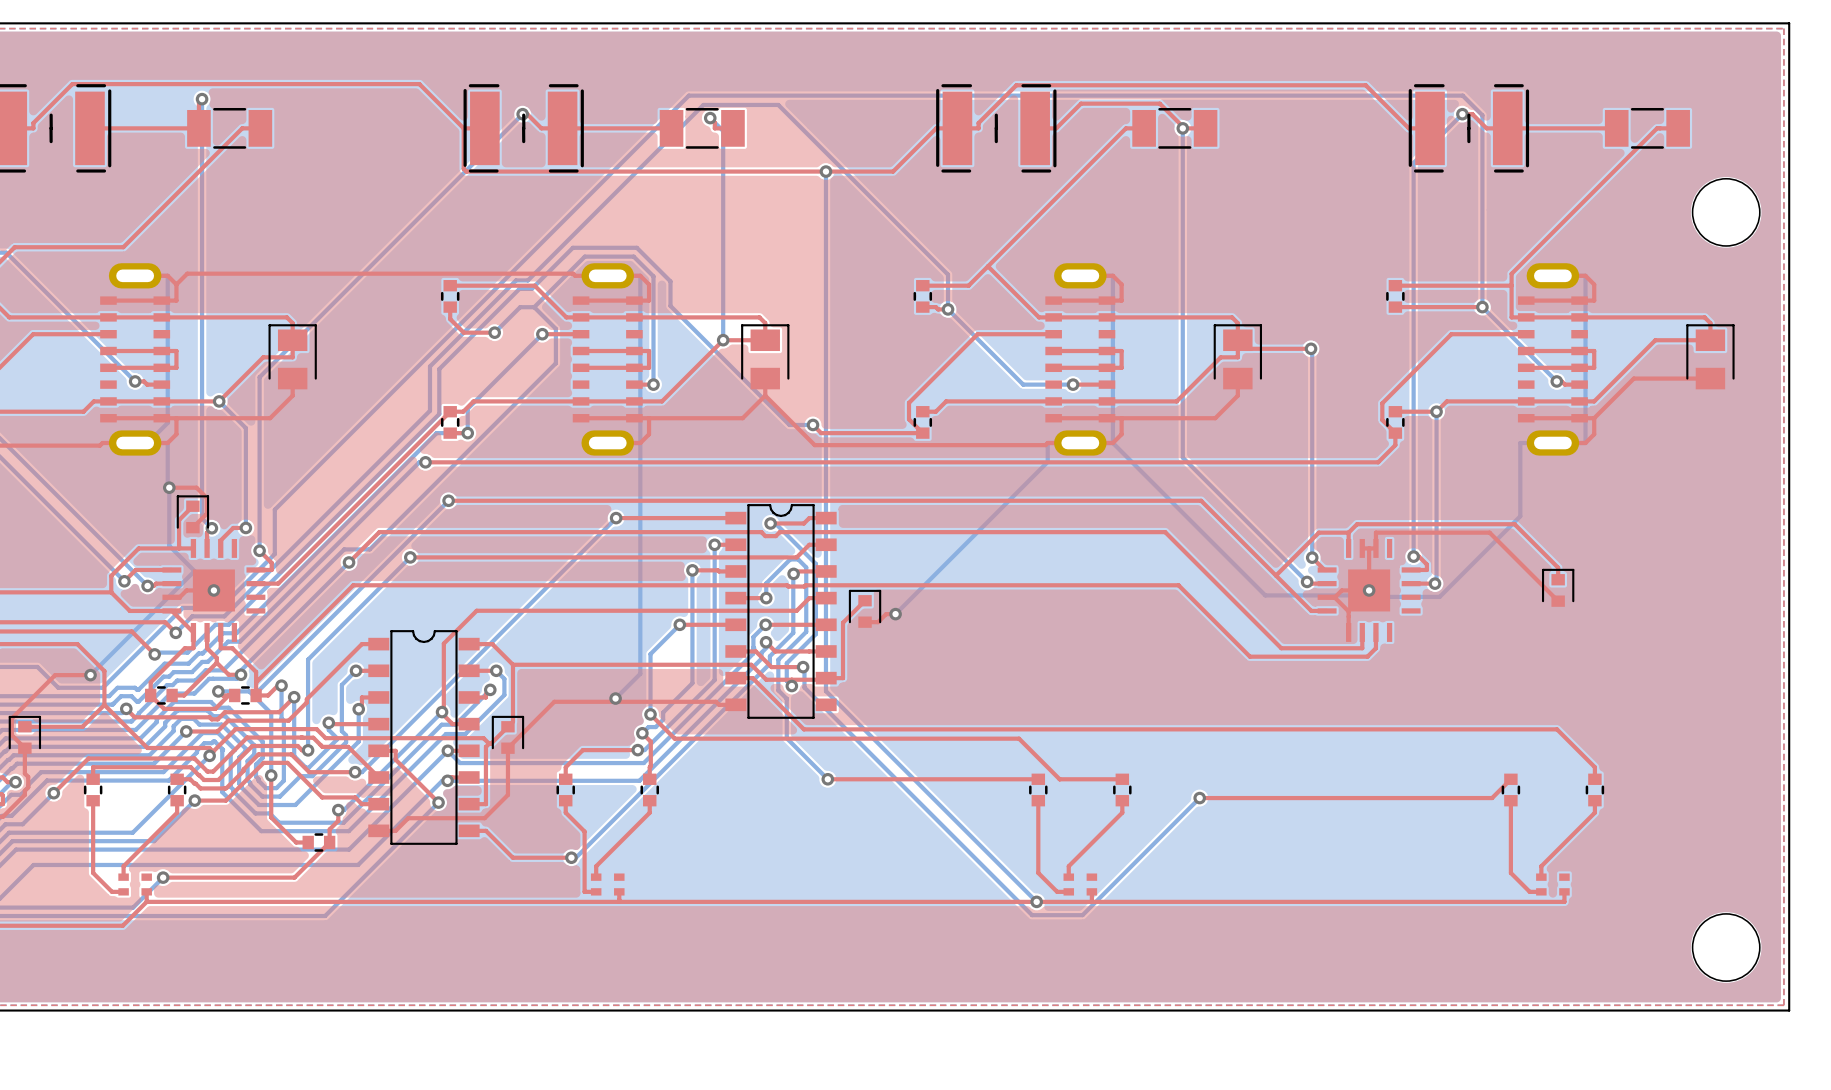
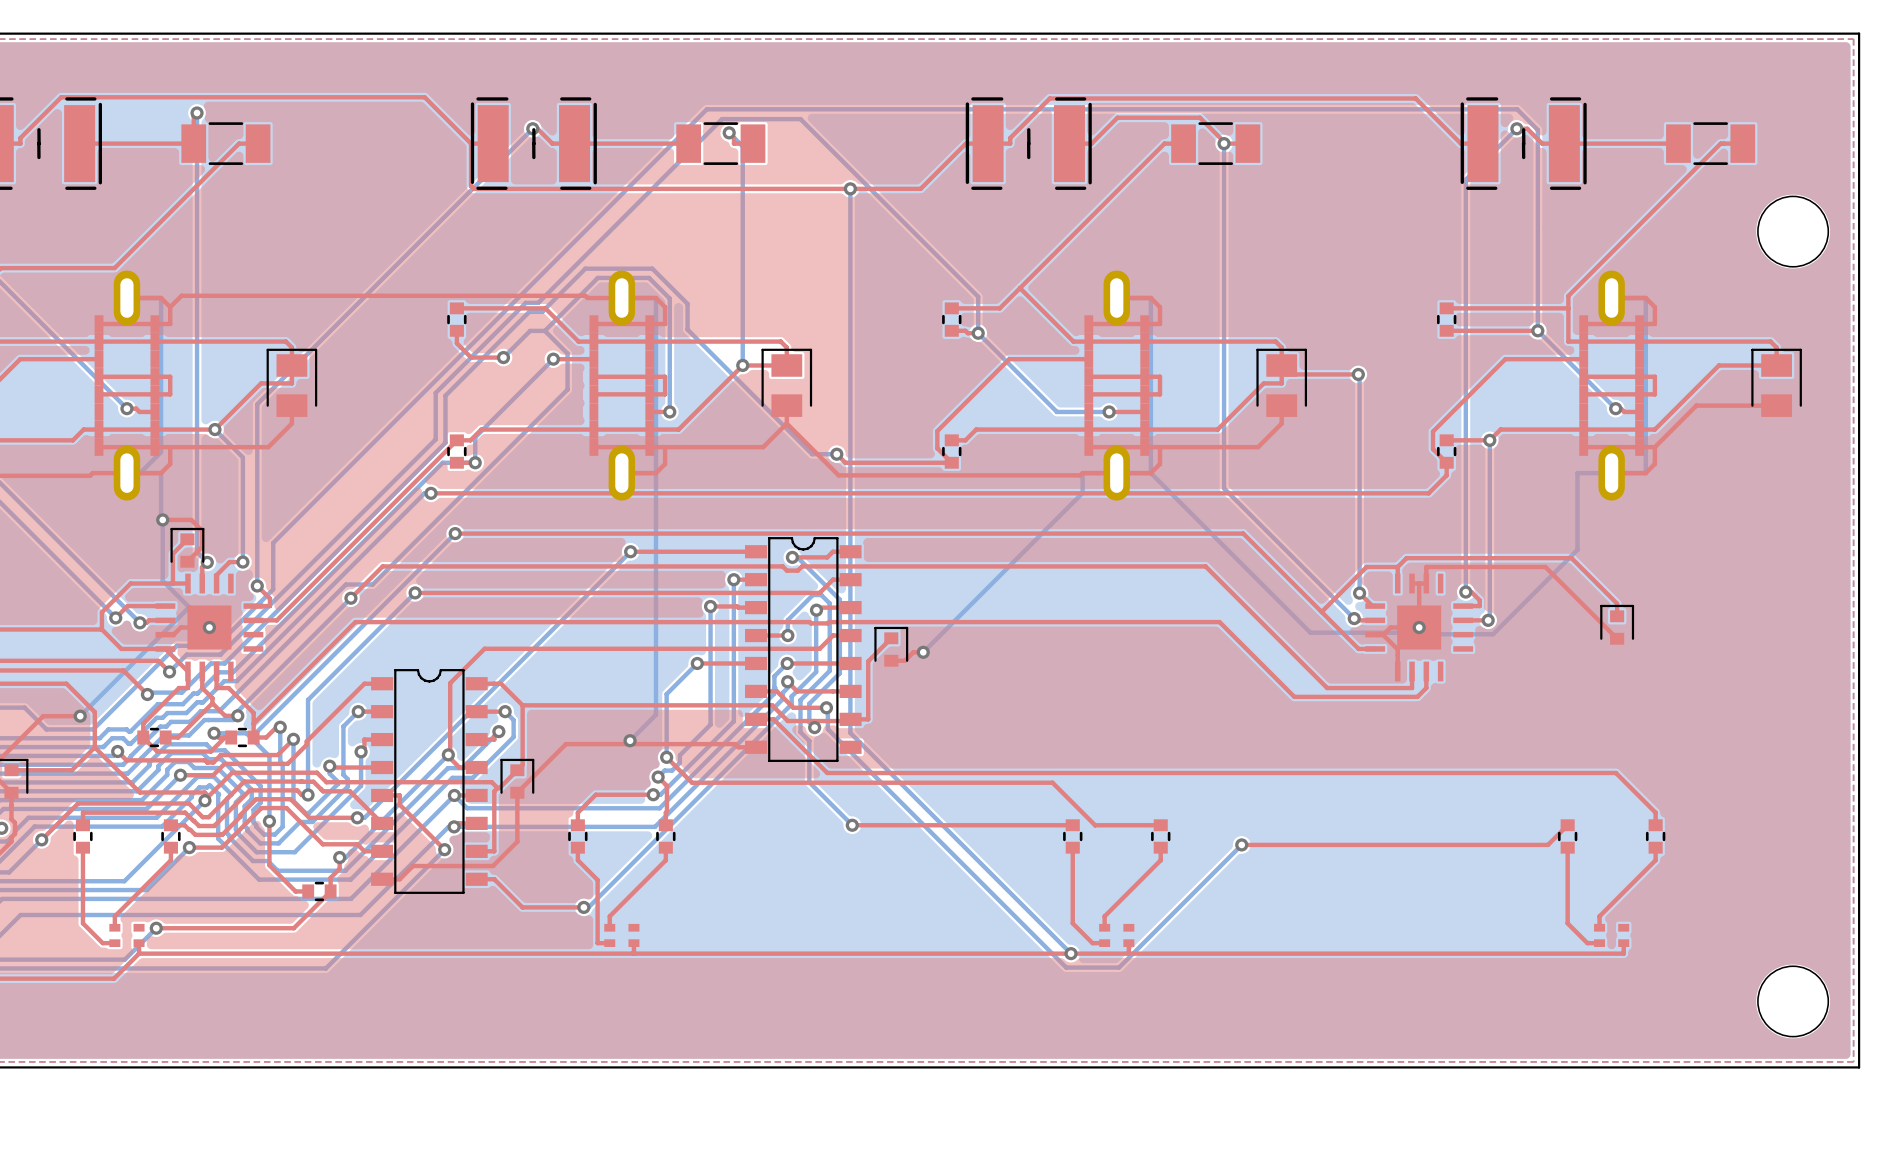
part footprint: [100, 263, 171, 456] -> [94, 270, 160, 501]
part footprint: [572, 263, 643, 456] -> [589, 270, 655, 501]
part footprint: [1045, 263, 1116, 456] -> [1084, 270, 1150, 501]
part footprint: [1517, 263, 1588, 456] -> [1579, 270, 1644, 501]

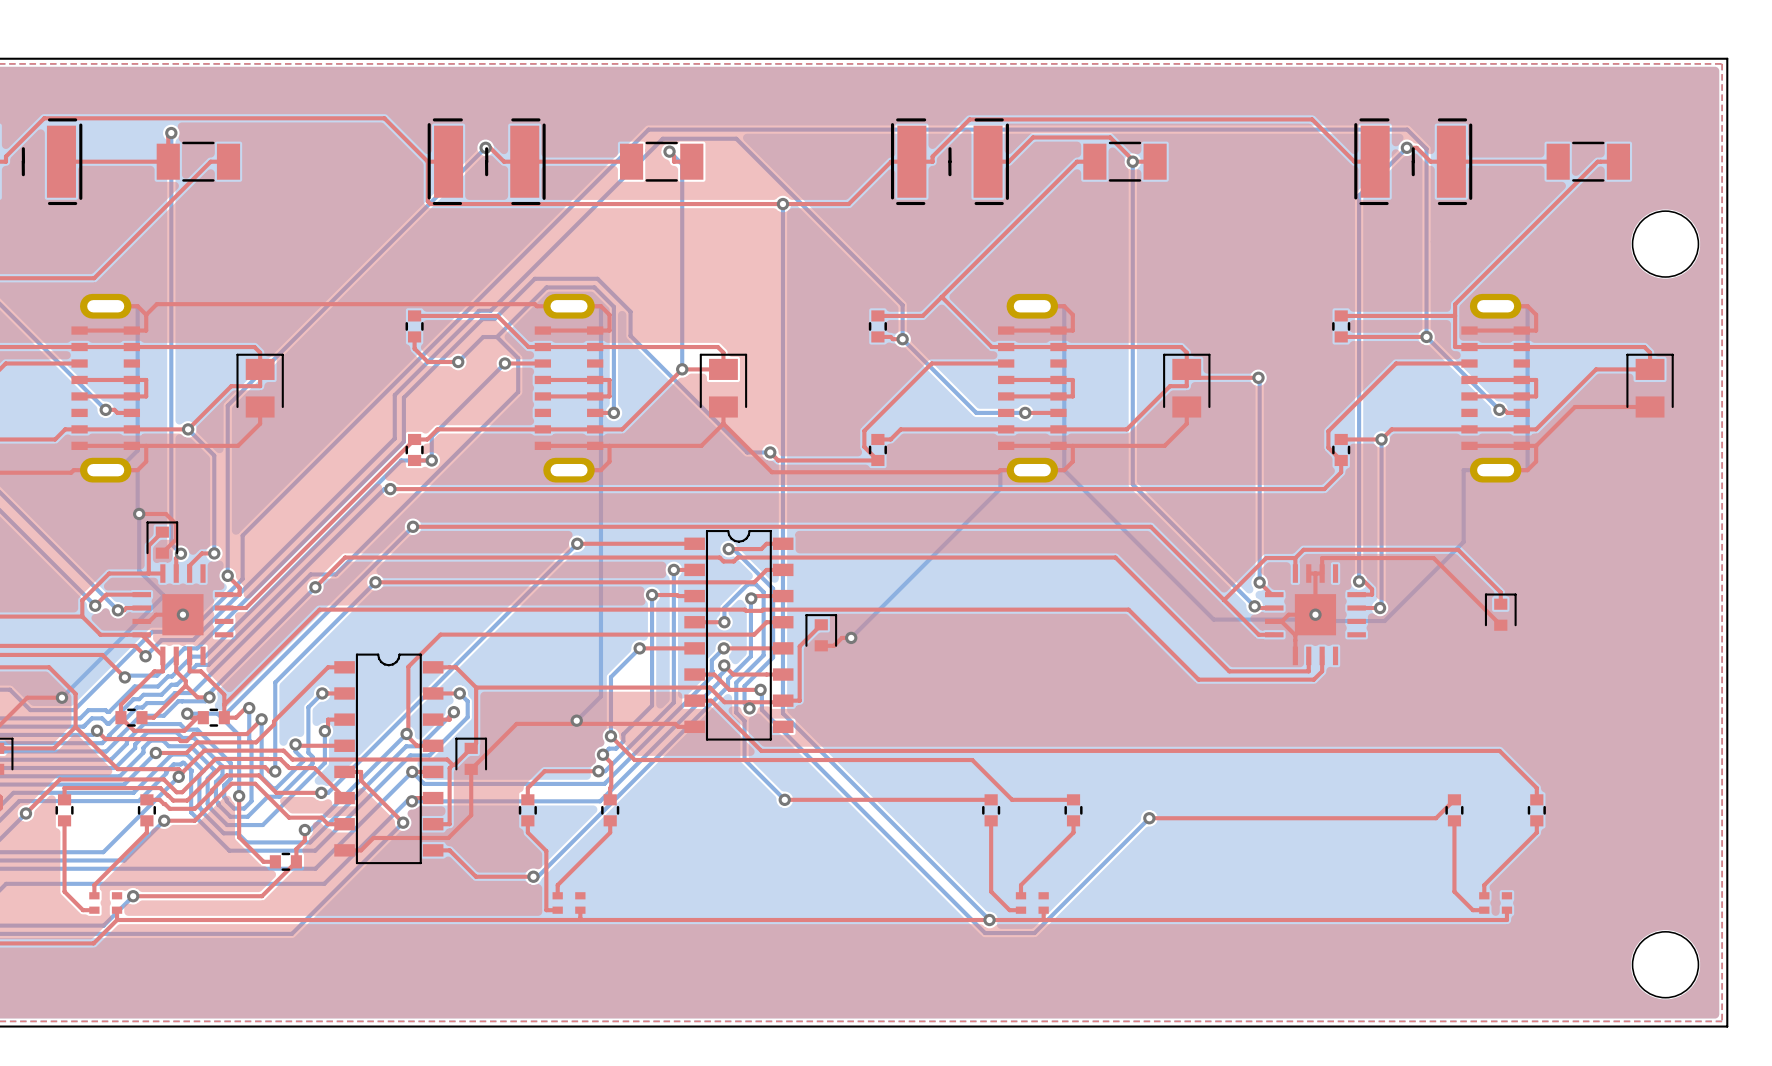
part footprint: [94, 270, 160, 501] -> [71, 293, 141, 483]
part footprint: [589, 270, 655, 501] -> [534, 293, 604, 483]
part footprint: [1084, 270, 1150, 501] -> [998, 293, 1067, 483]
part footprint: [1579, 270, 1644, 501] -> [1461, 293, 1530, 483]

